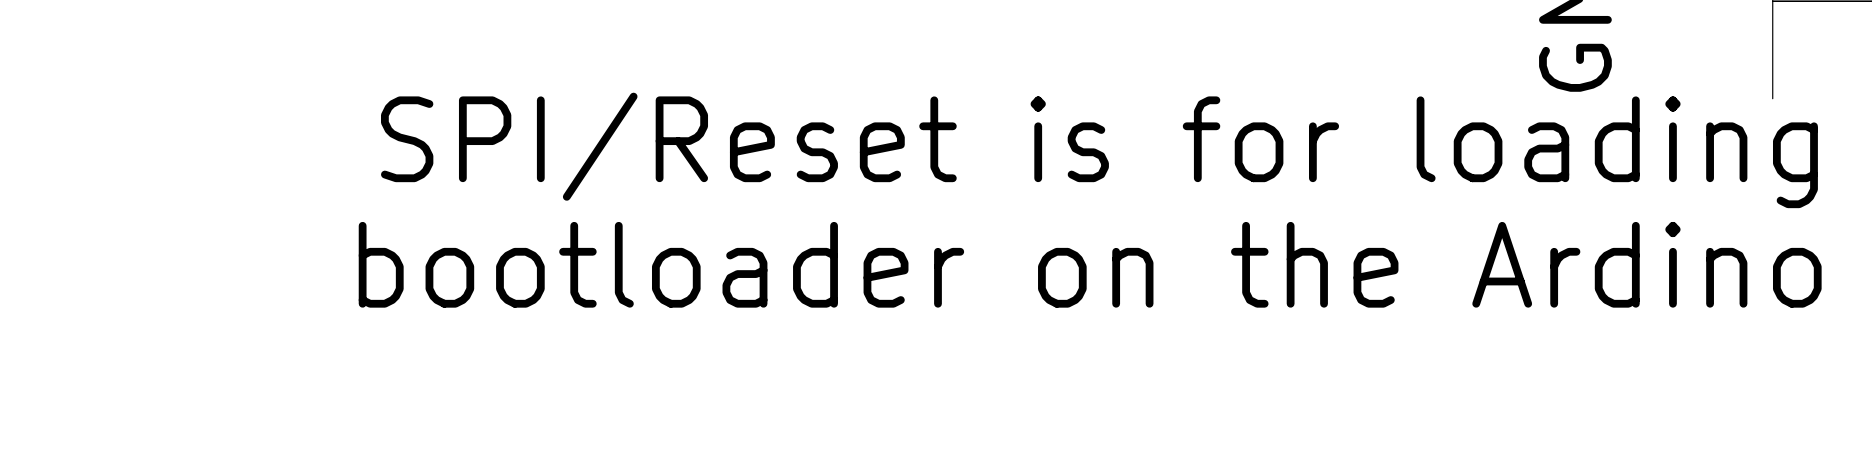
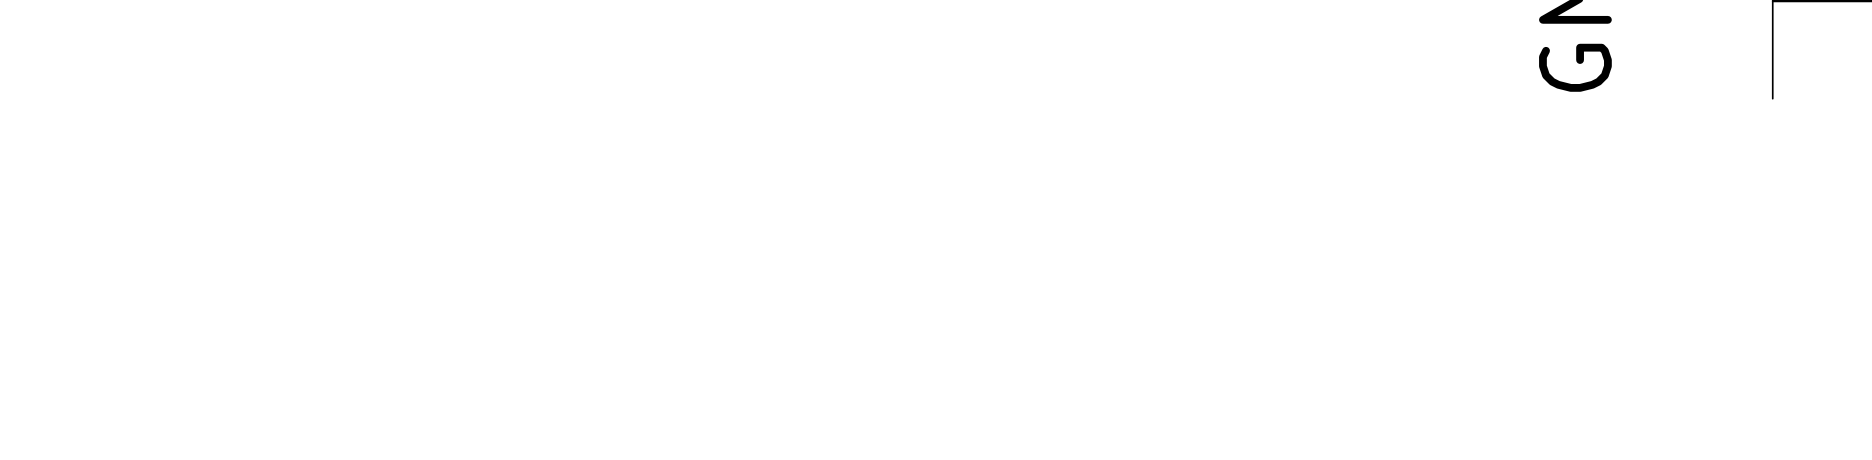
text: SPI/Reset is for loading (1099, 150) -> none
text: bootloader on the Ardino (1090, 264) -> none

